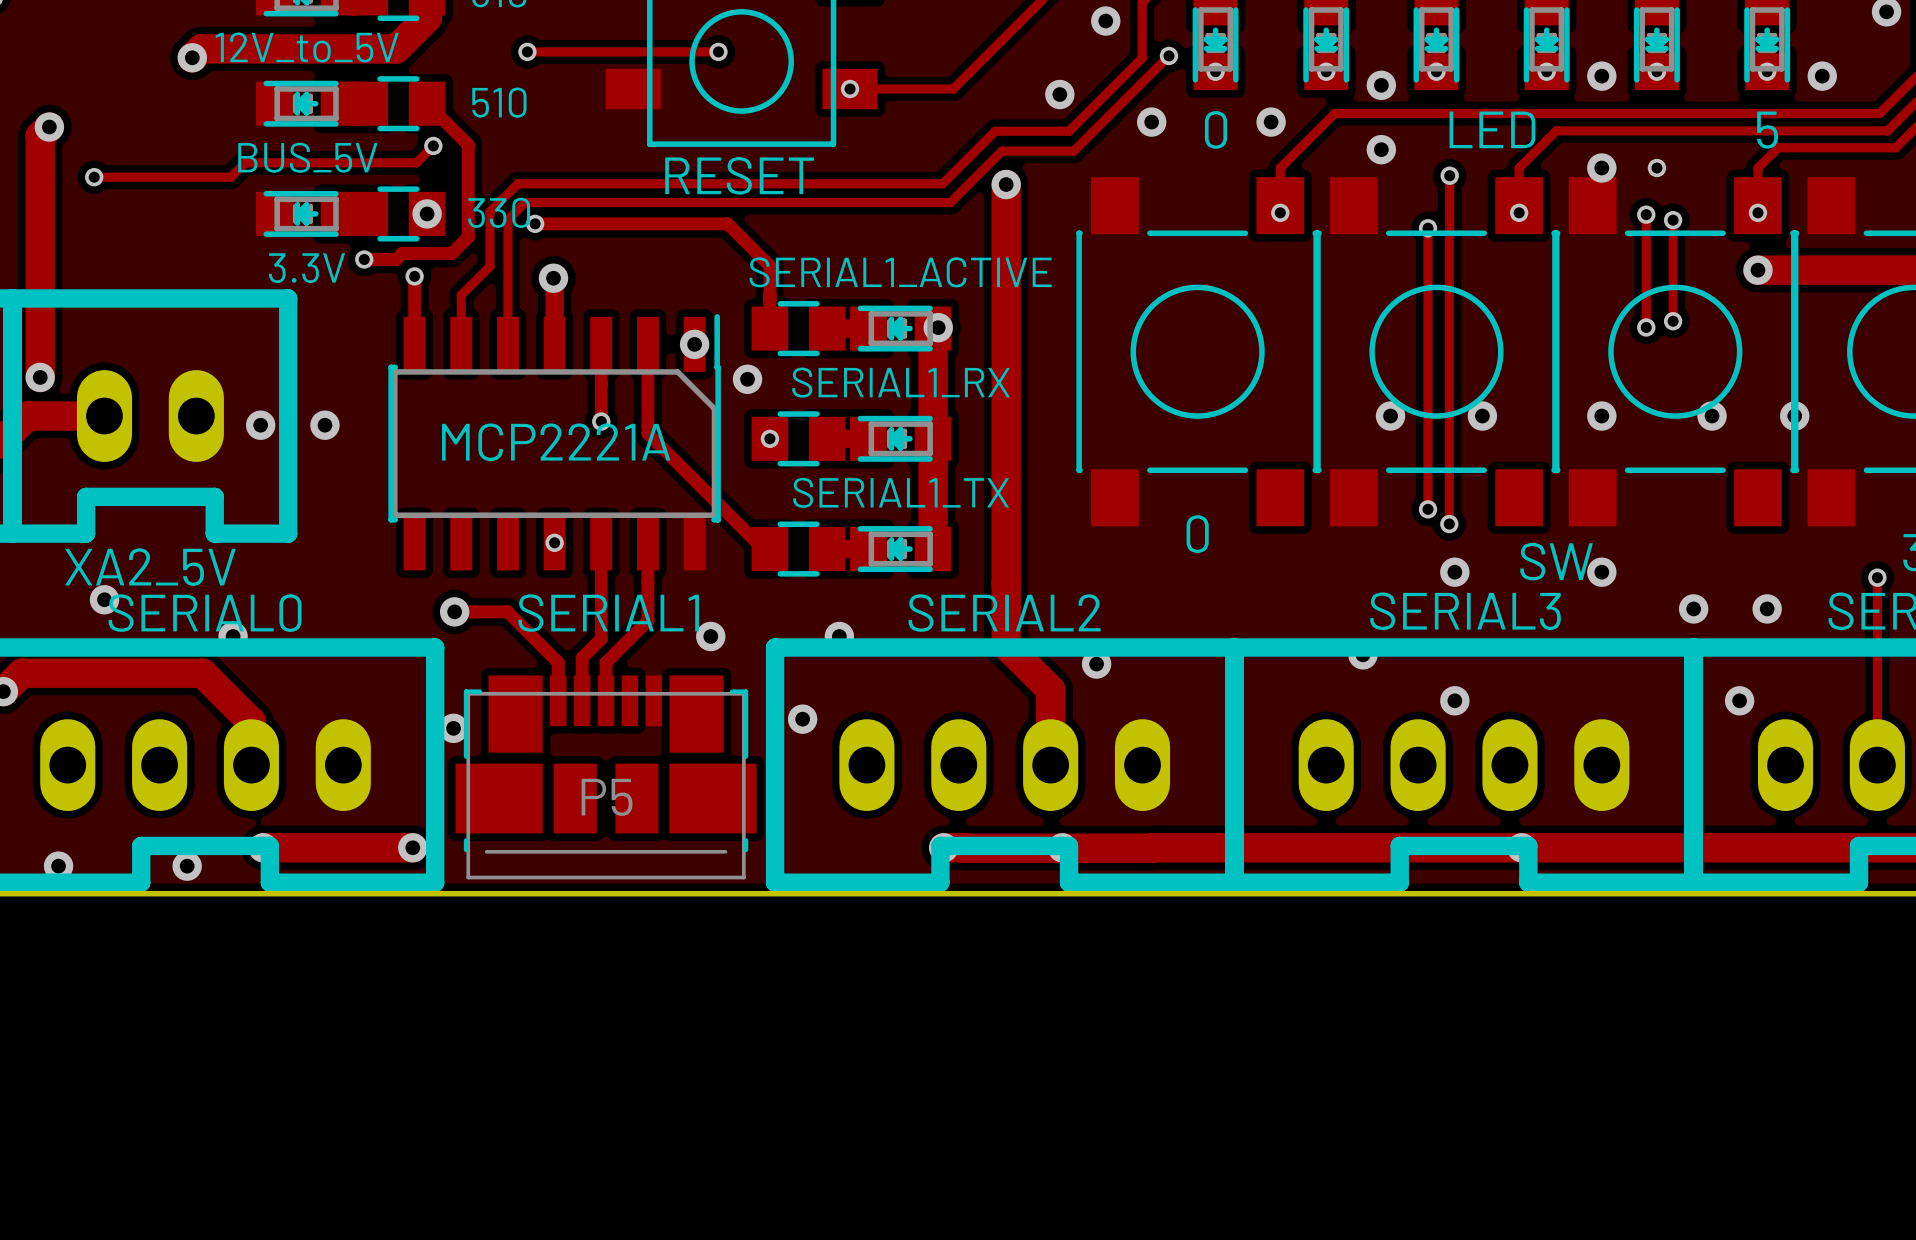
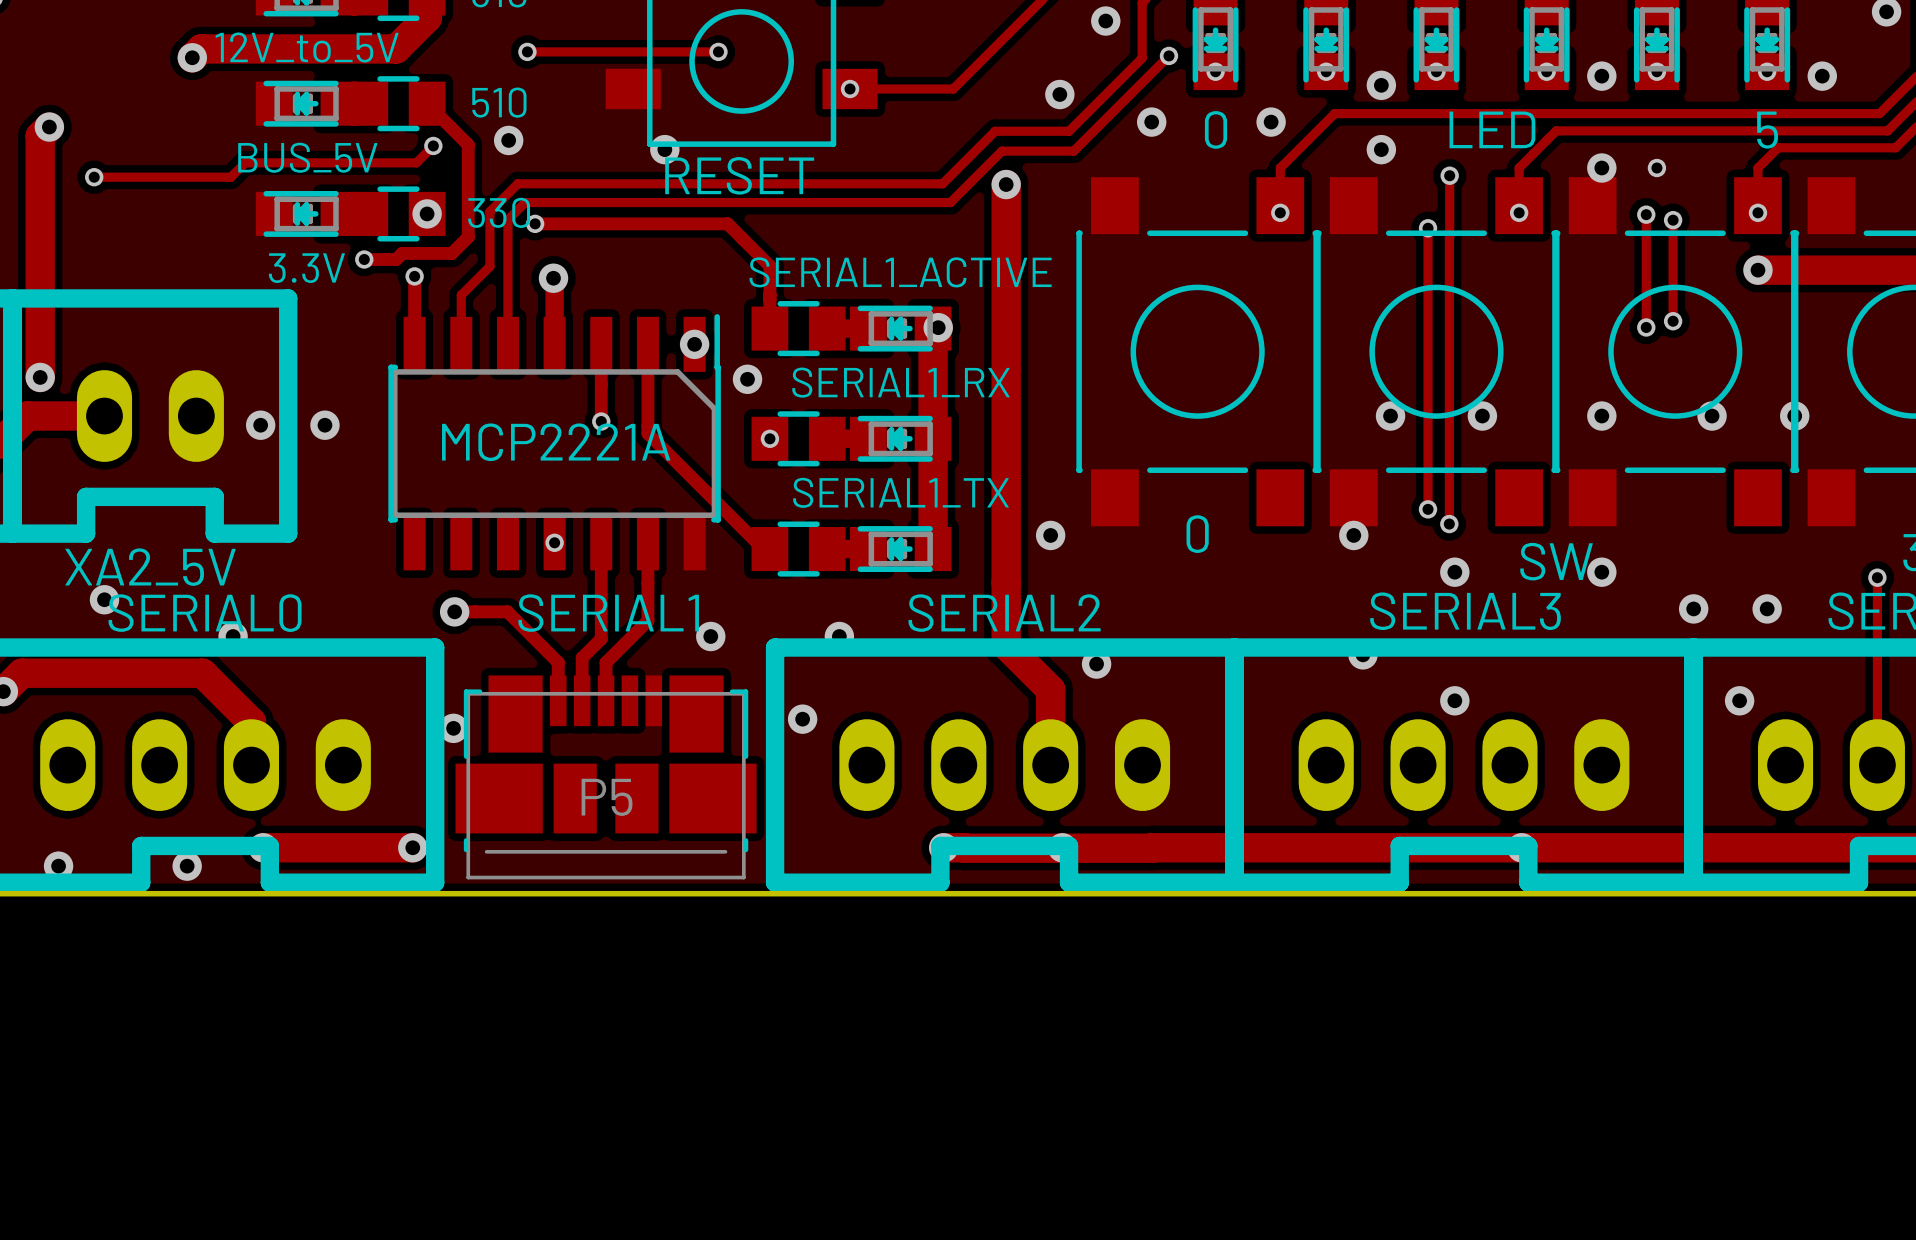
via: none -> (508, 140)
via: none -> (664, 149)
via: none -> (1050, 535)
via: none -> (1353, 535)

